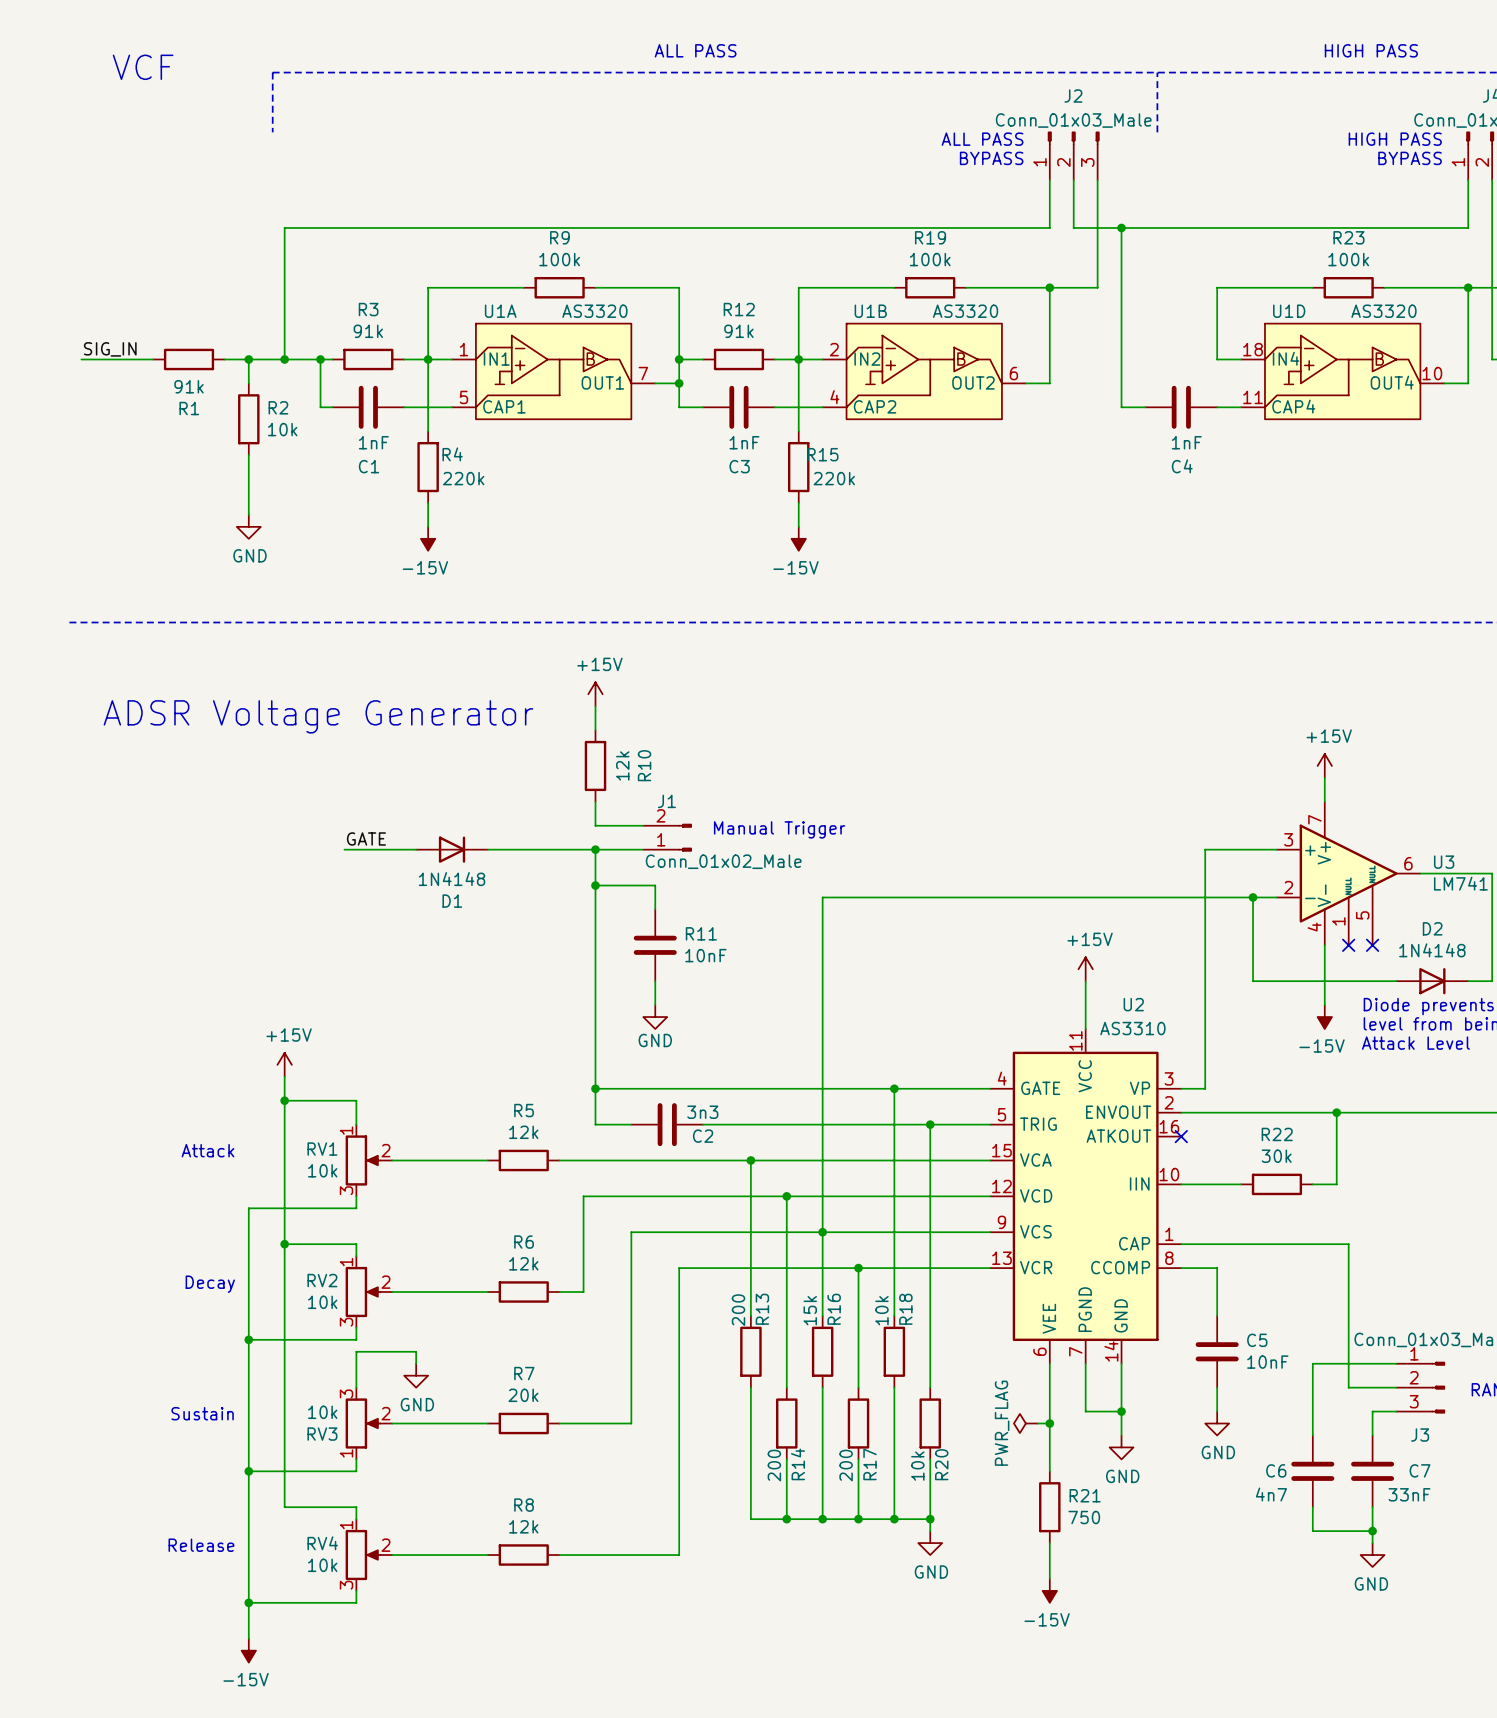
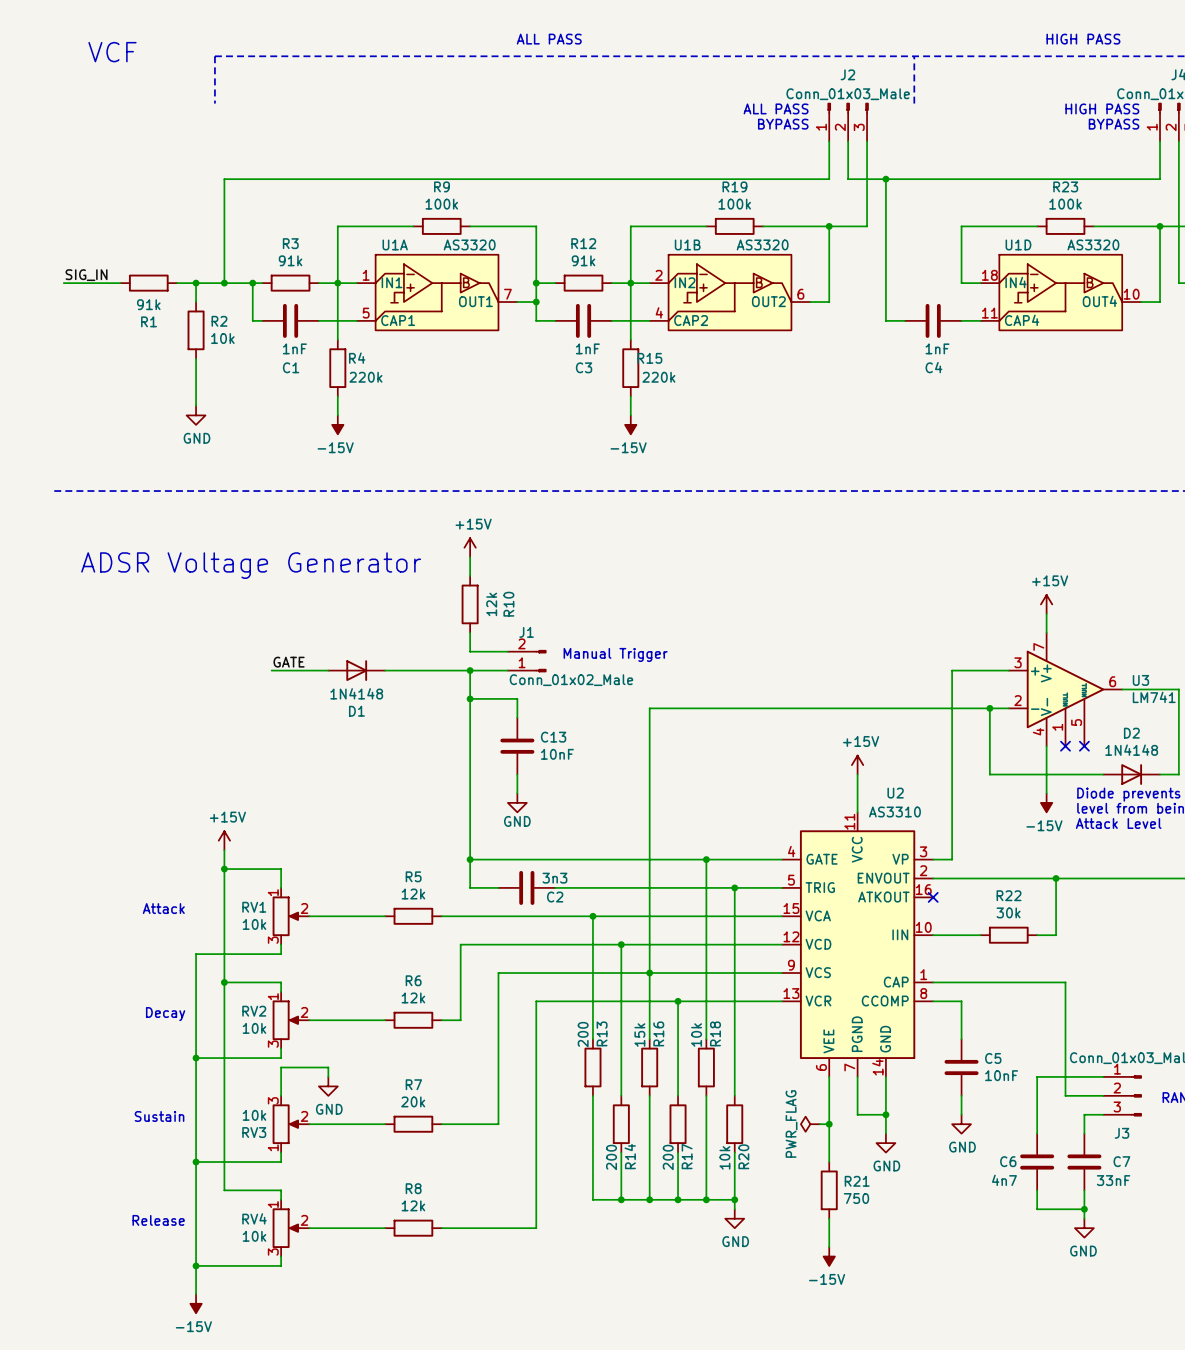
R11 name: R11 (701, 933) -> C13 (553, 737)

